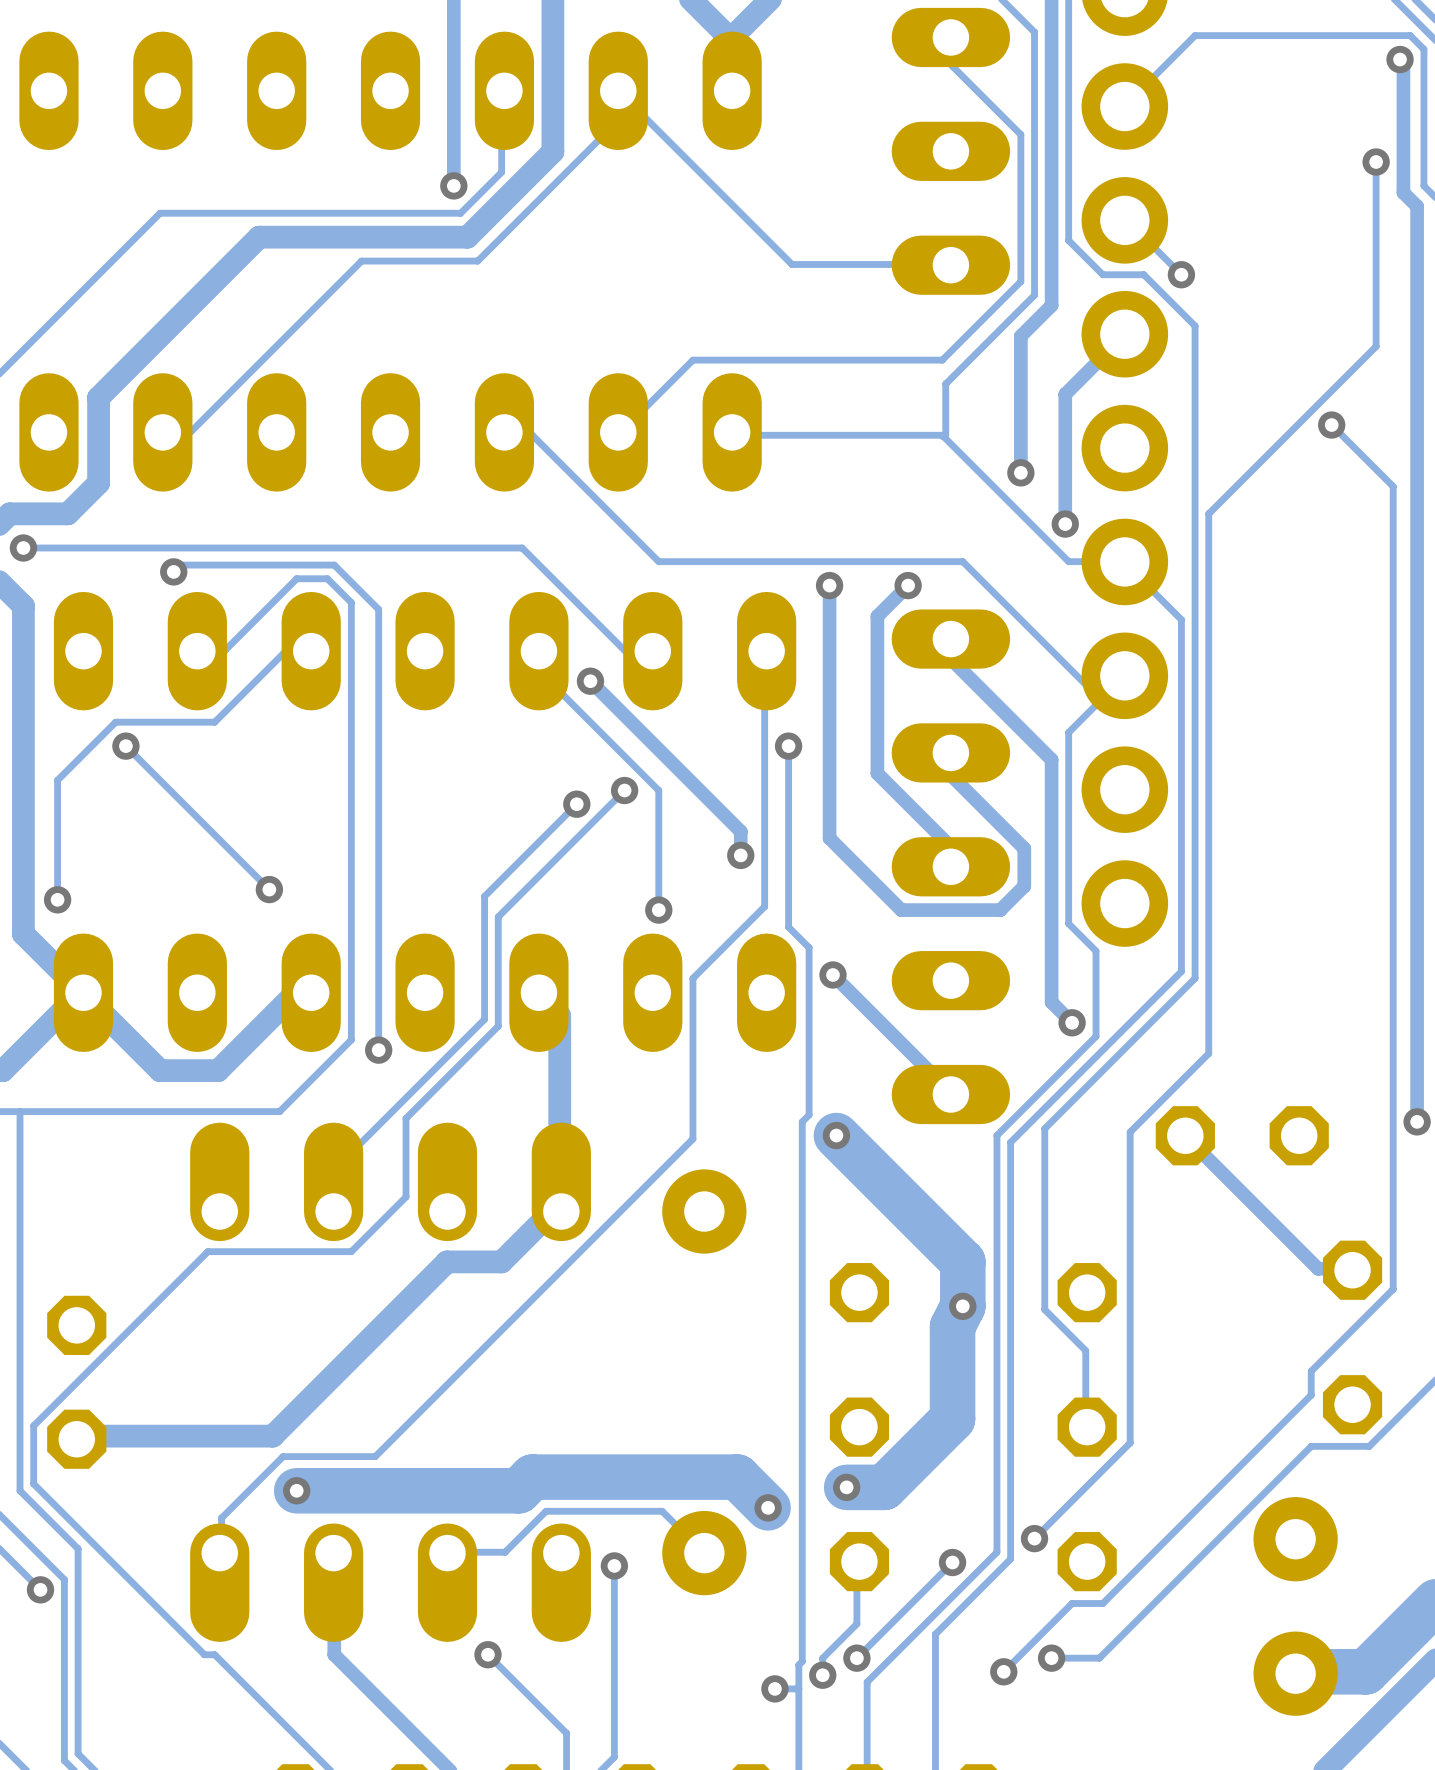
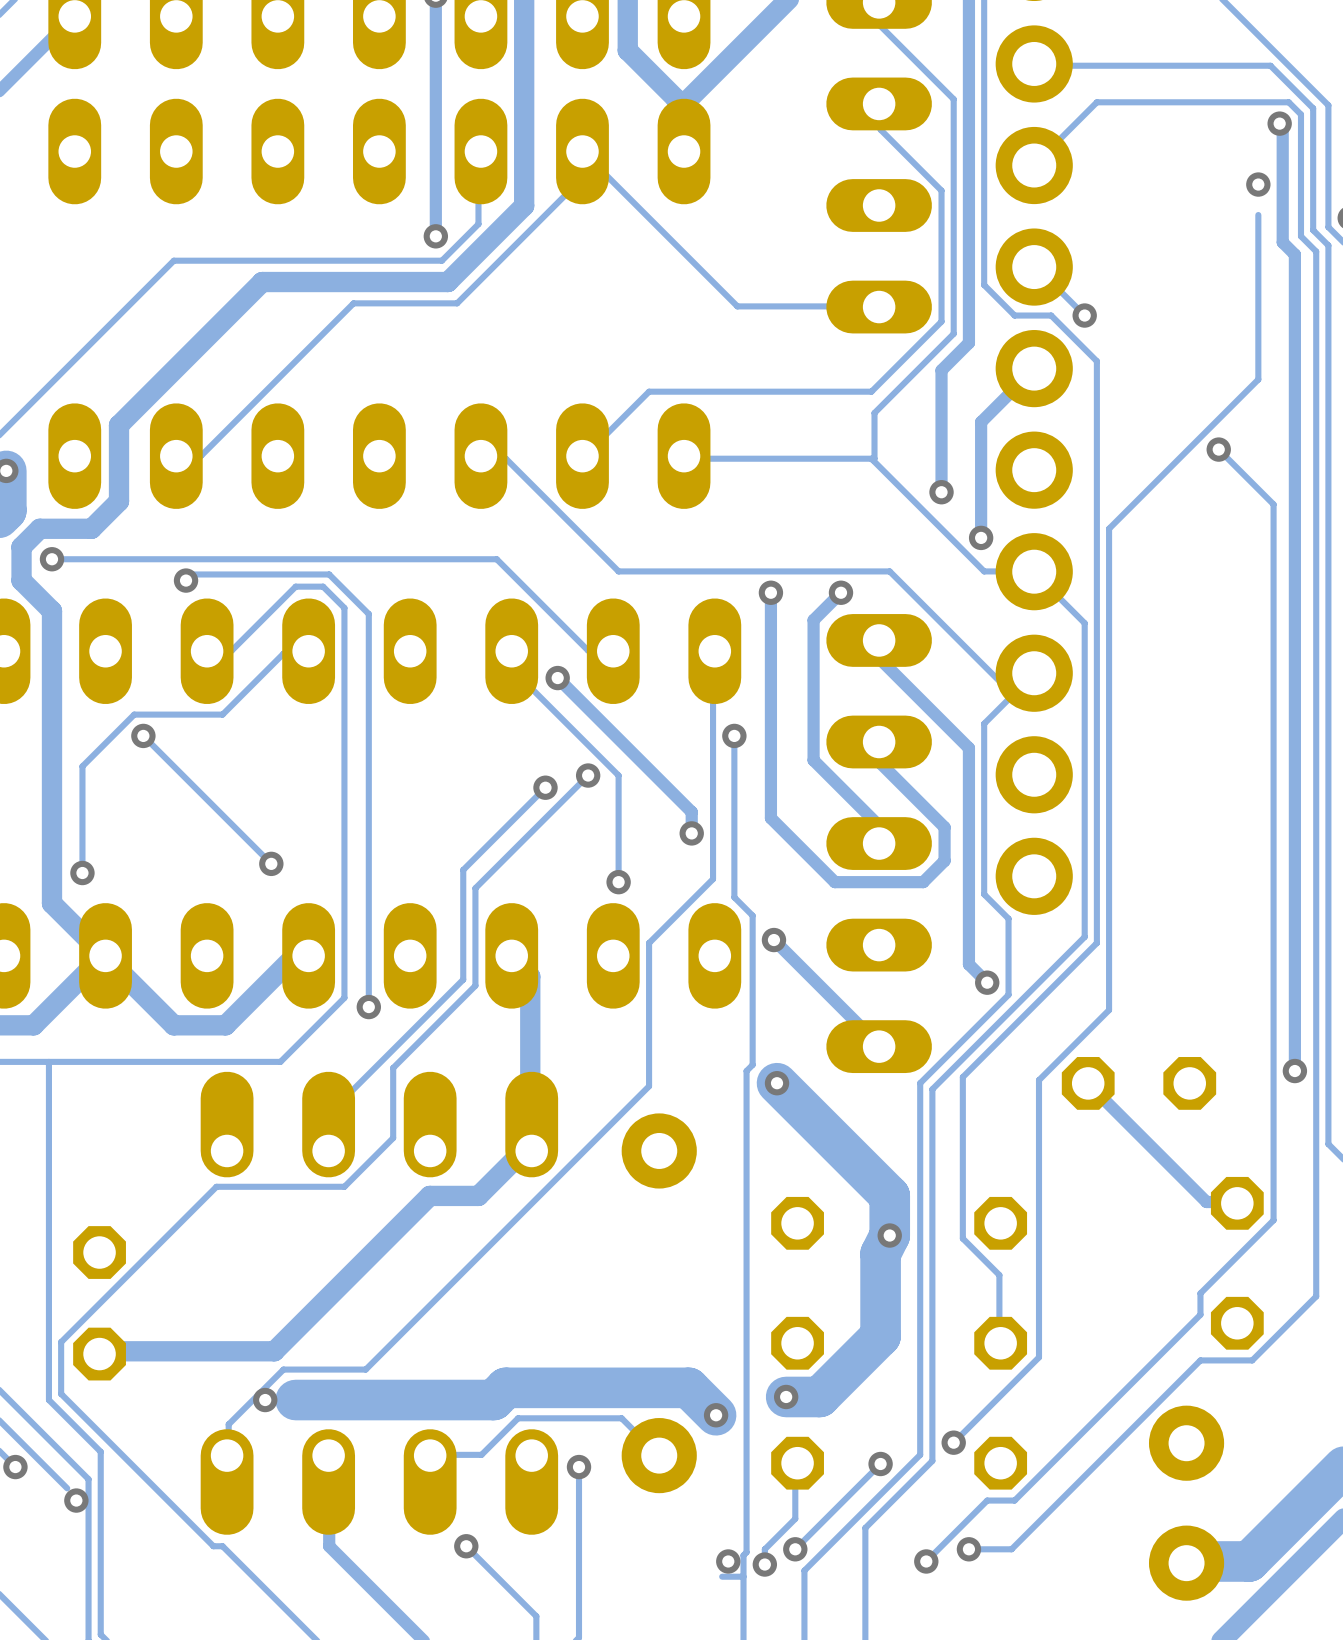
via position: (1376, 162) -> (1258, 184)
via position: (296, 1490) -> (265, 1400)
via position: (40, 1589) -> (76, 1500)
via position: (774, 1688) -> (728, 1561)

